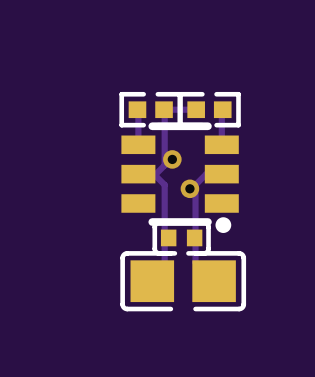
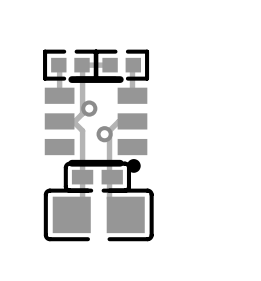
part footprint: [152, 220, 211, 256] -> [63, 161, 131, 193]

